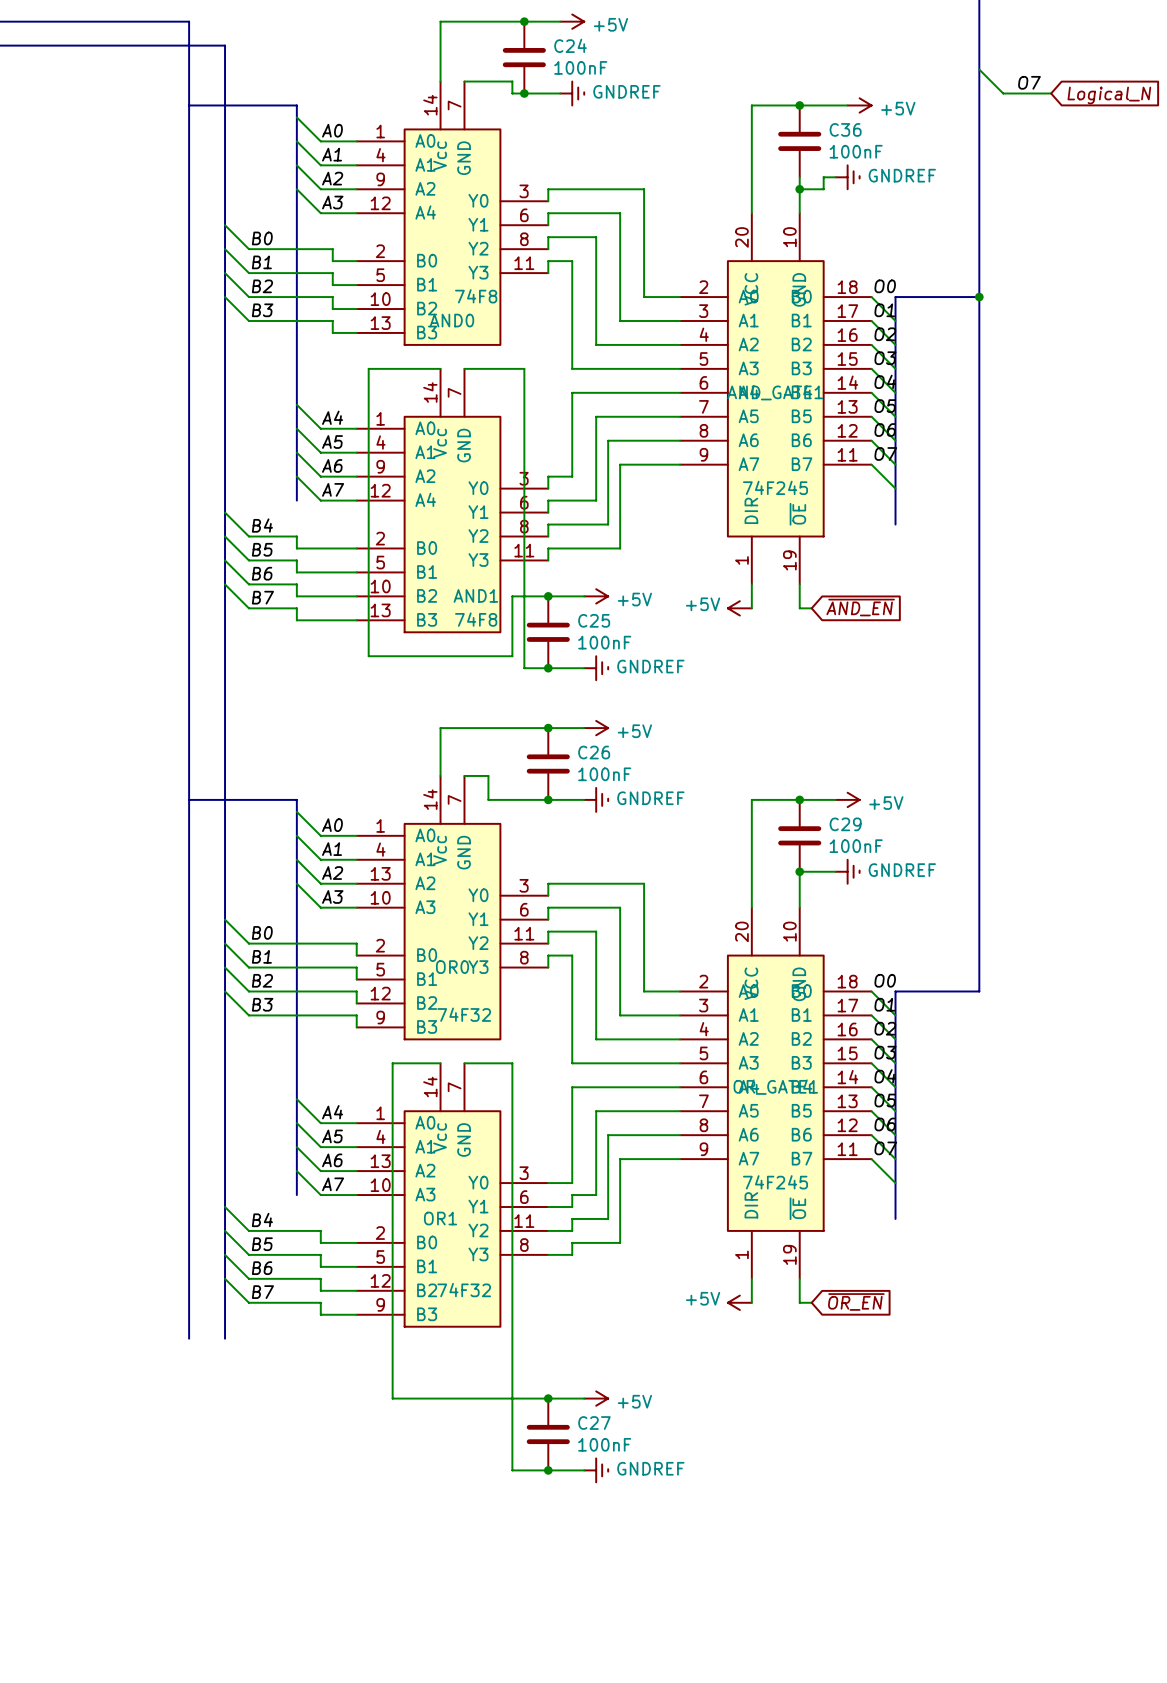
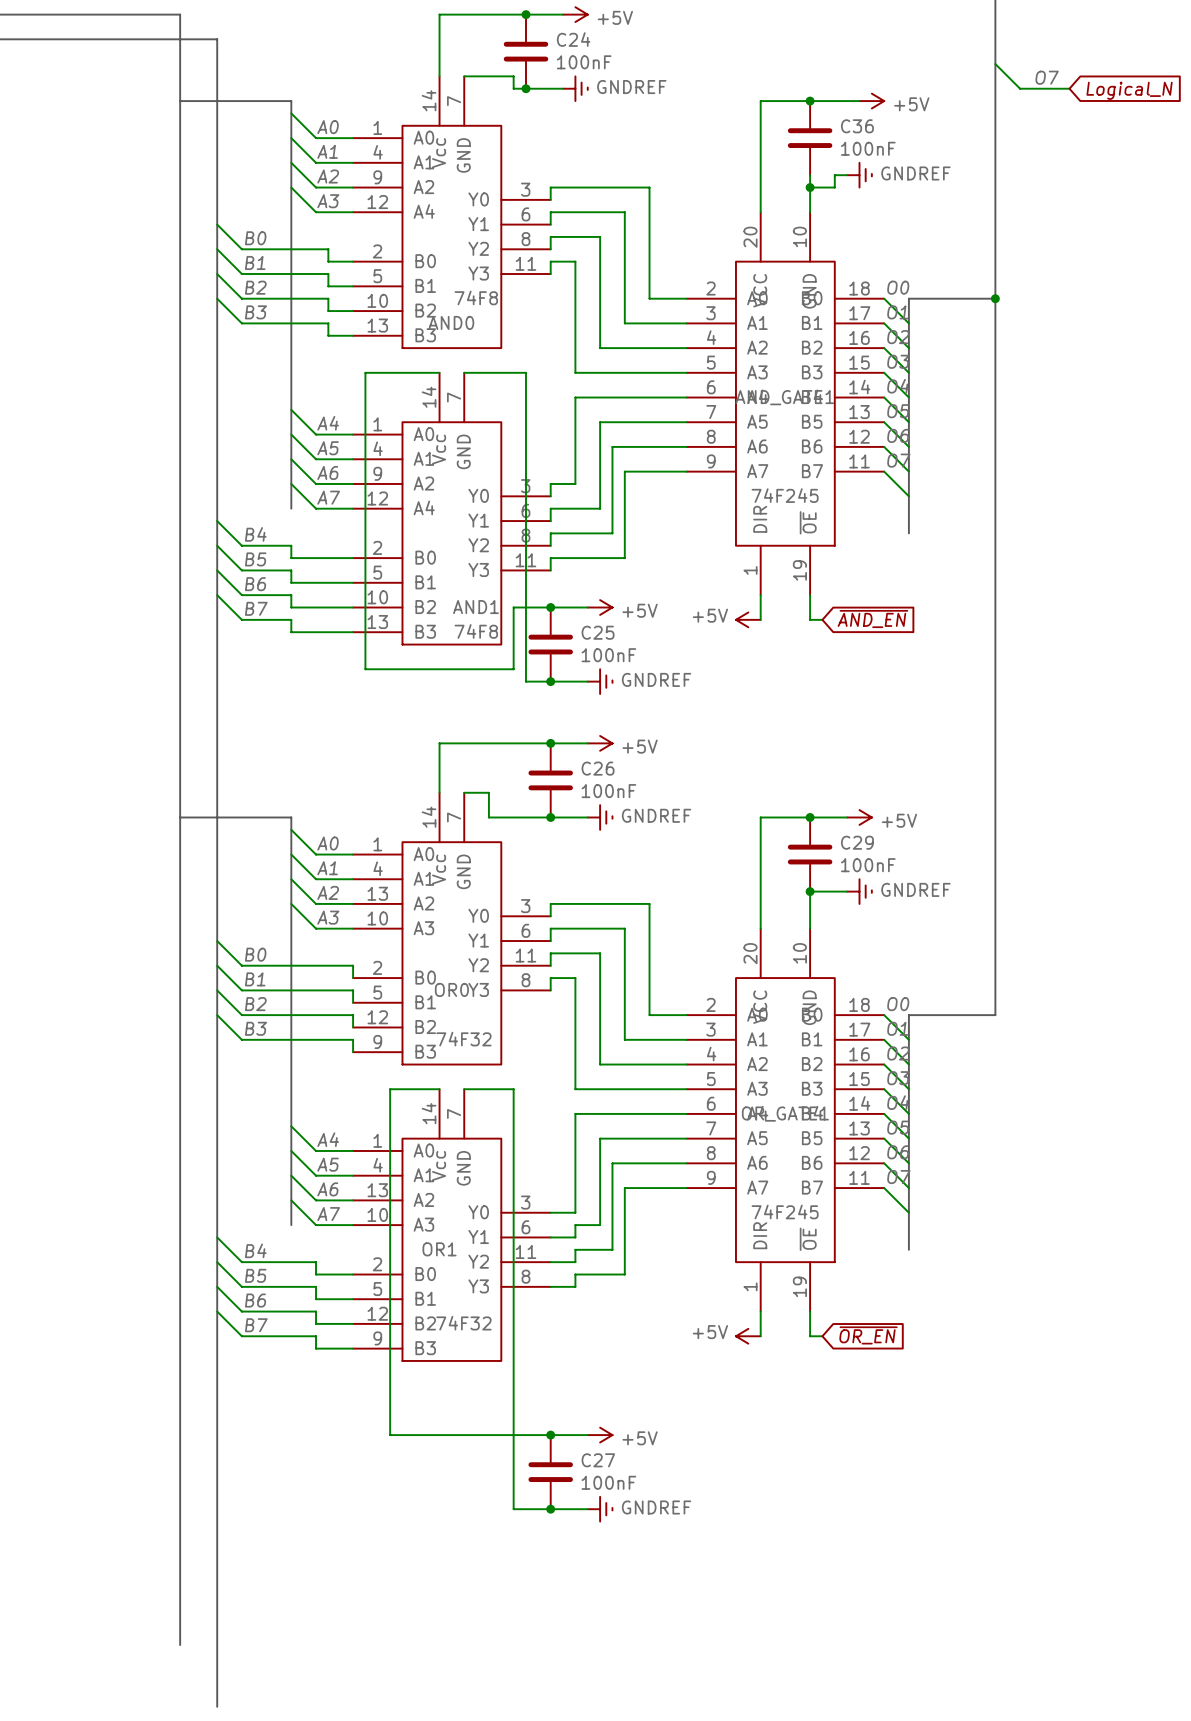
bus: none -> (180, 1373) (180, 1645)
bus: none -> (217, 1373) (217, 1706)

